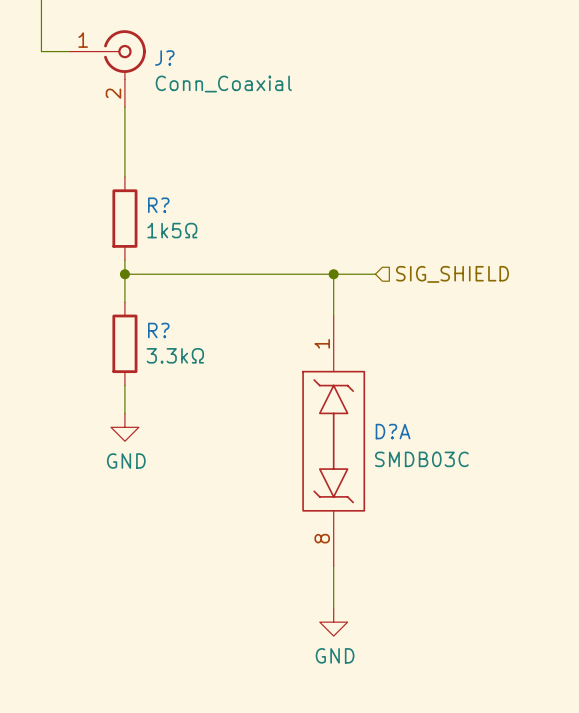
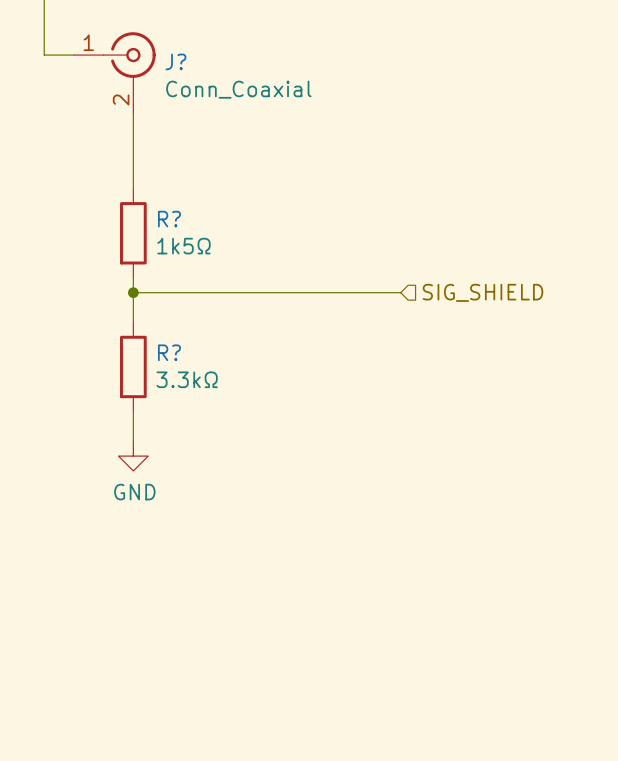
wire: (333, 274) (333, 315) -> none
junction: (333, 274) -> none
D?A: SMDB03C (333, 441) -> none
wire: (333, 566) (333, 608) -> none
power symbol: GND (333, 622) -> none

